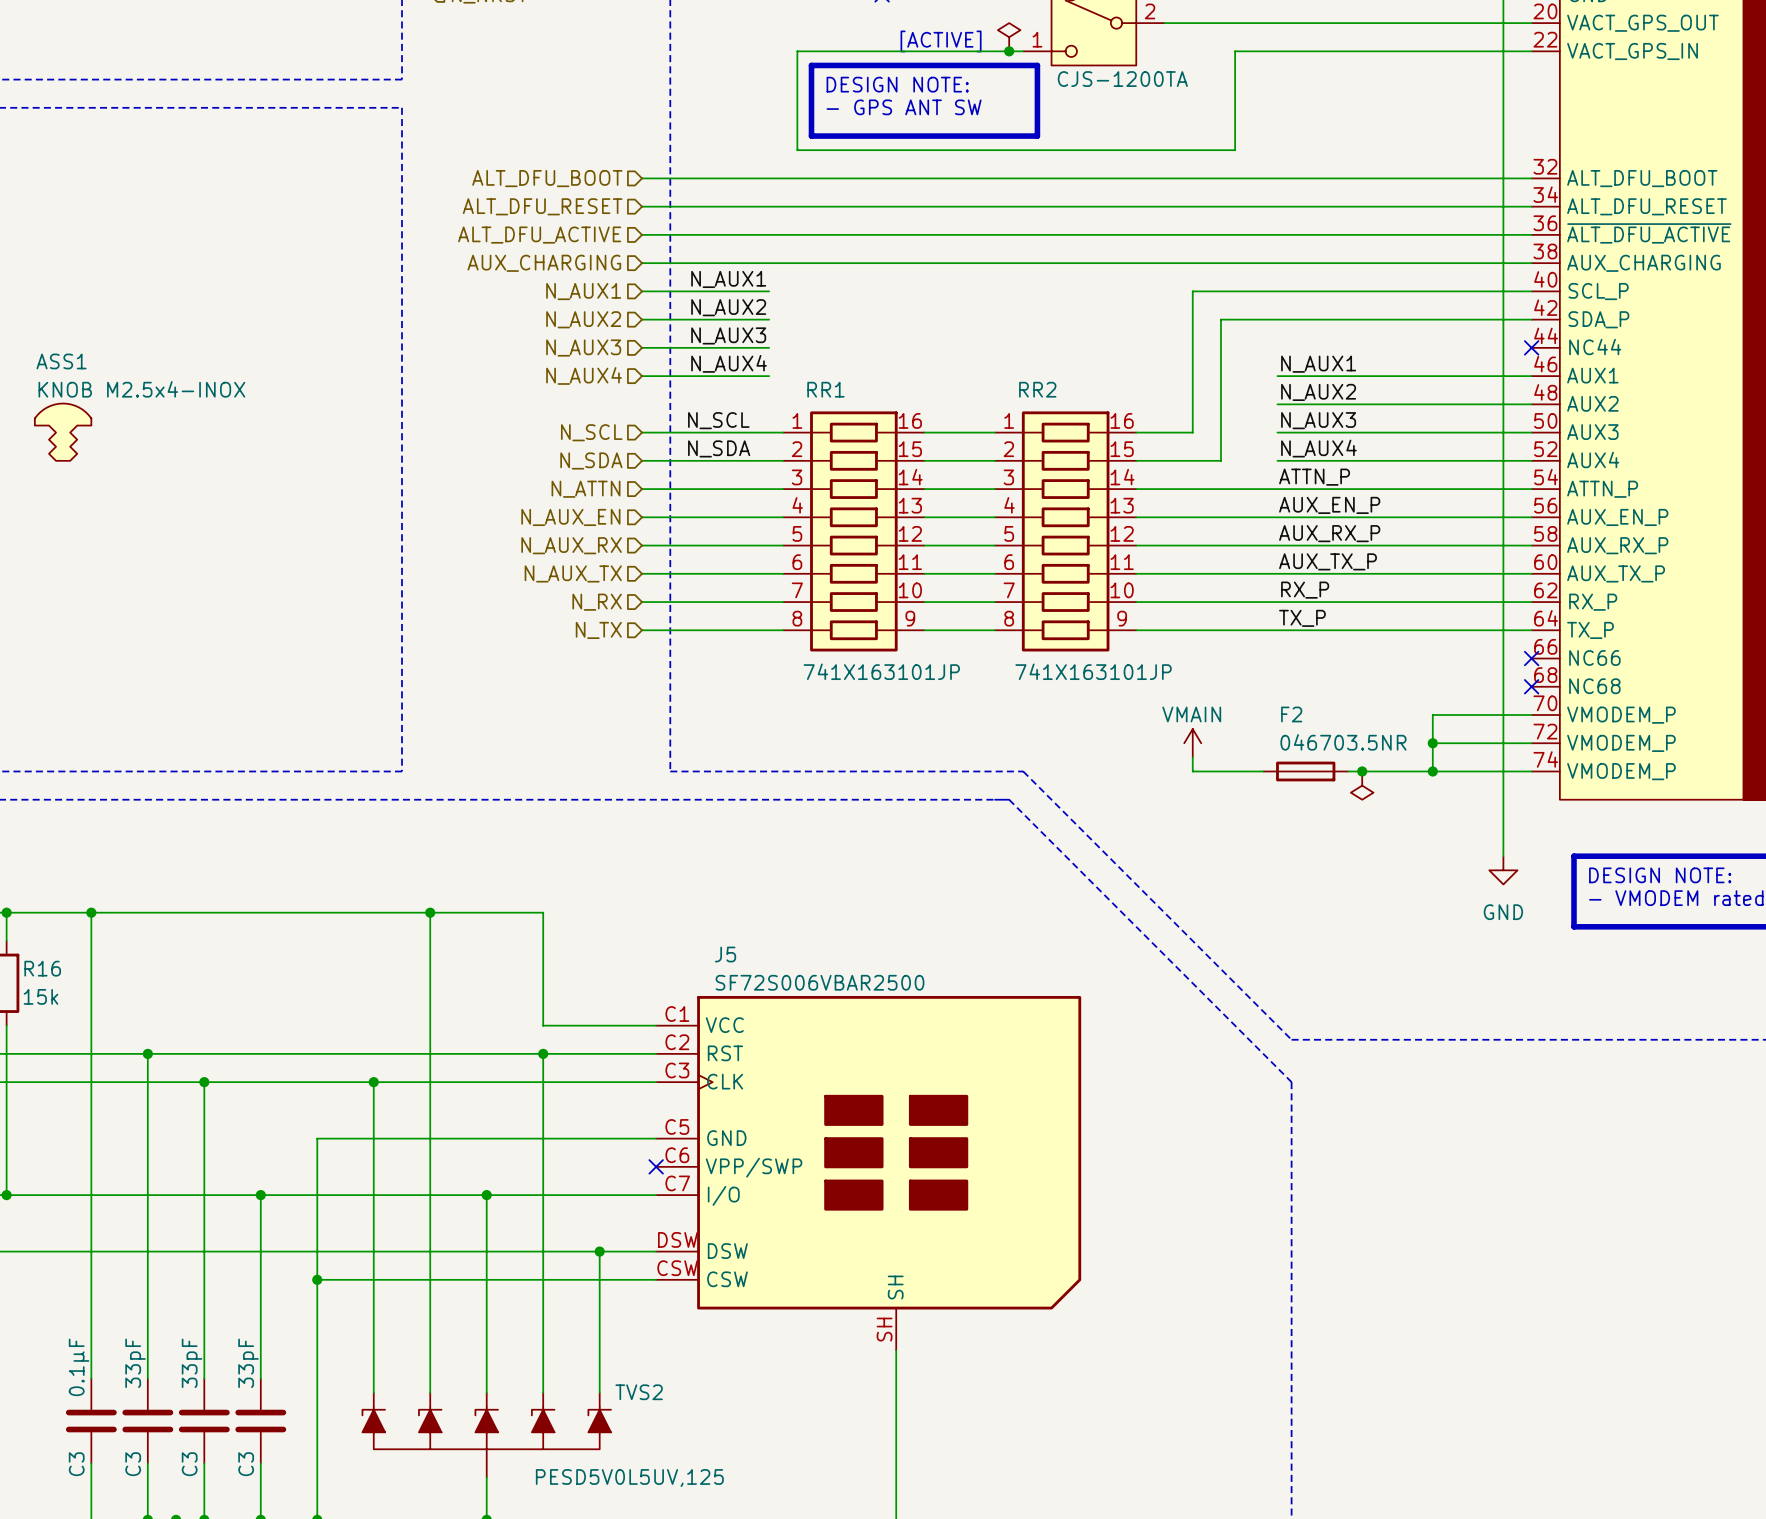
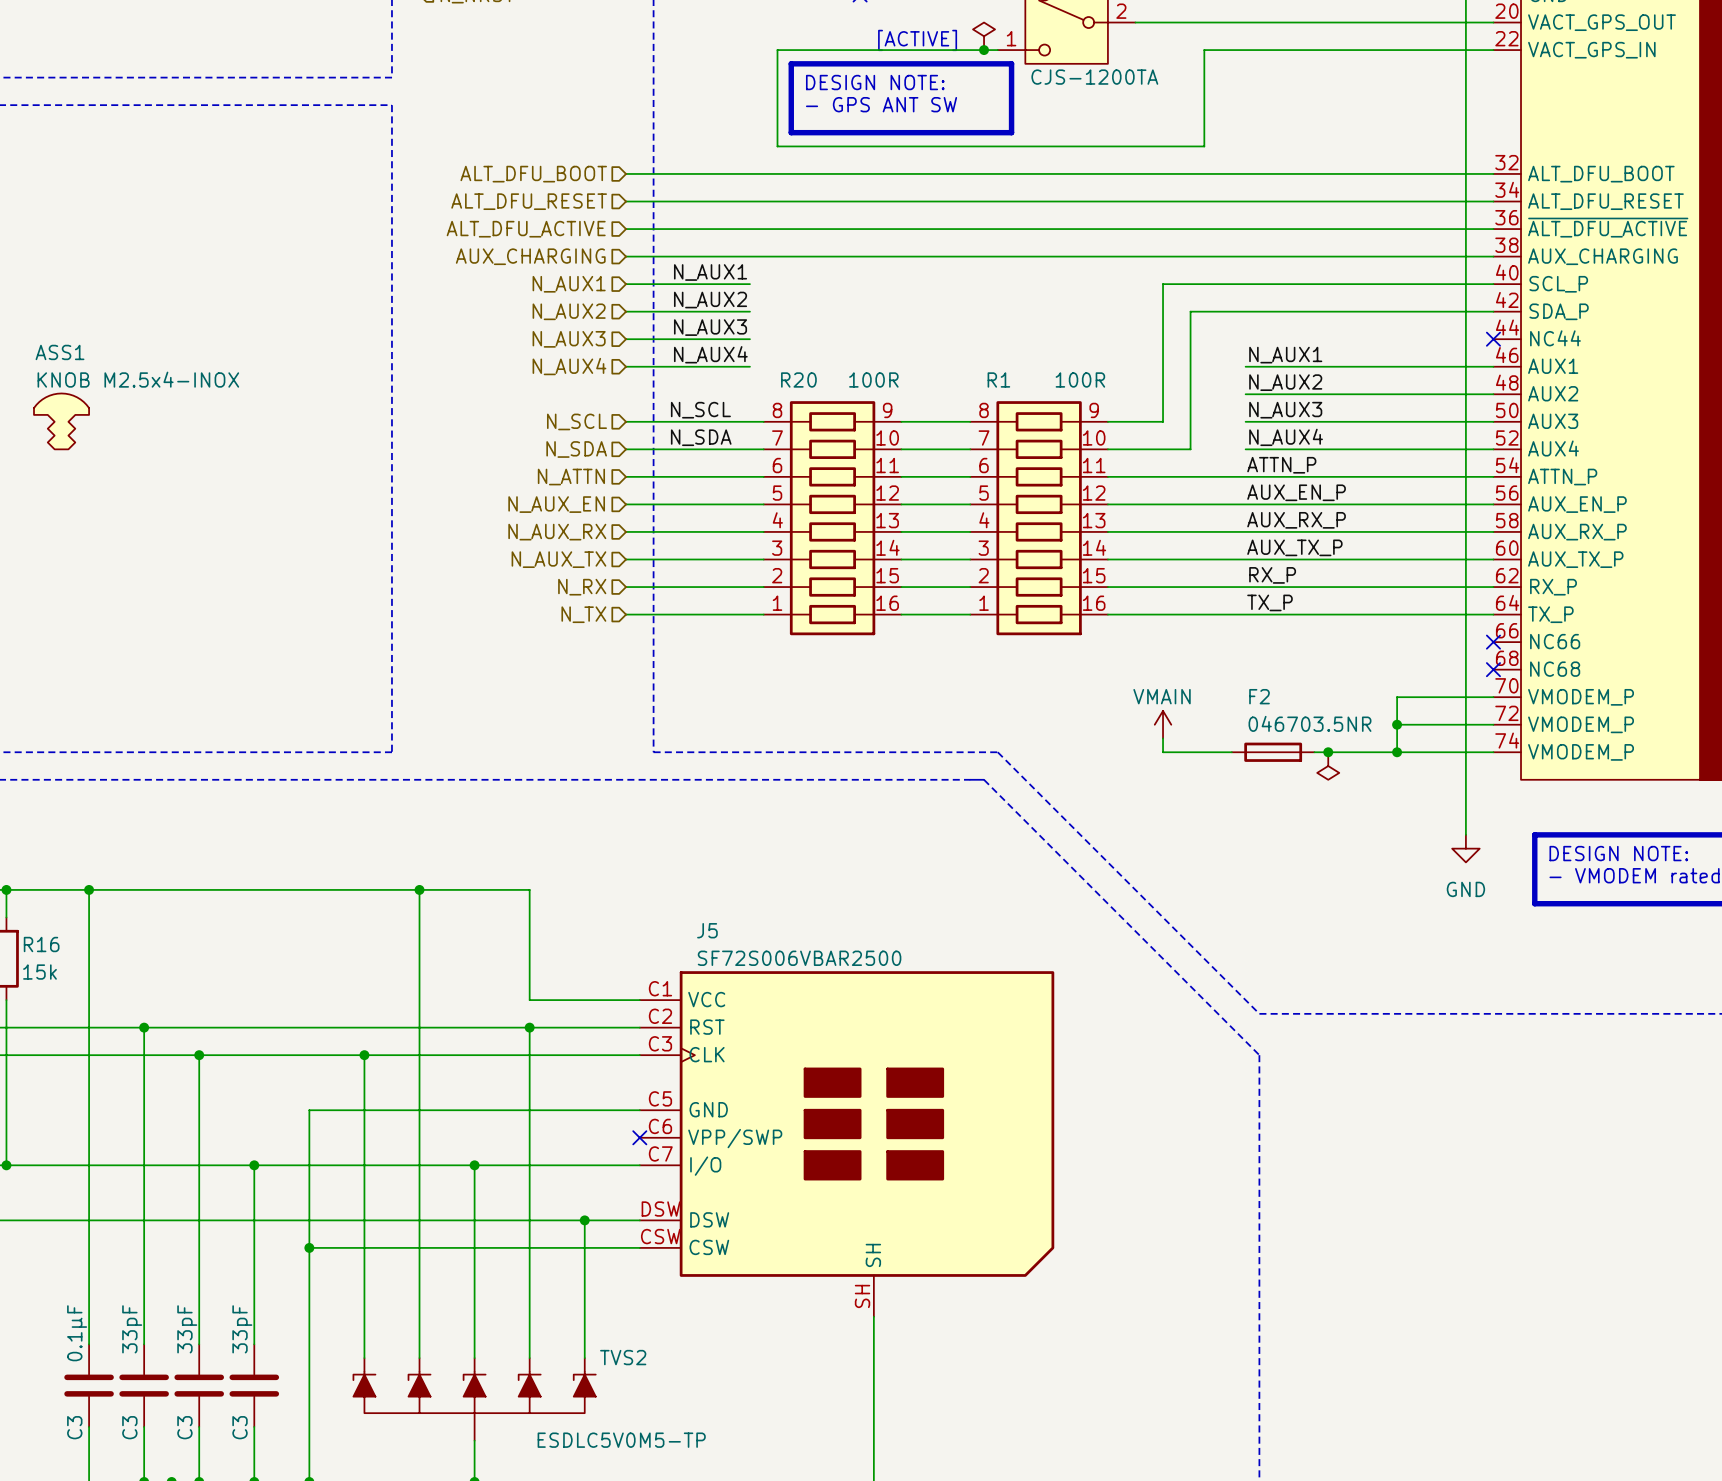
RR1 name: RR1 (825, 389) -> R20 (798, 379)
RR2 name: RR2 (1037, 389) -> R1 (998, 379)
RR1 flip: as is (853, 531) -> up-down (832, 518)
RR2 flip: as is (1065, 531) -> up-down (1039, 518)
RR1 value: 741X163101JP (881, 671) -> 100R (873, 379)
RR2 value: 741X163101JP (1093, 671) -> 100R (1080, 379)
TVS2 value: PESD5V0L5UV,125 (629, 1477) -> ESDLC5V0M5-TP (621, 1440)

